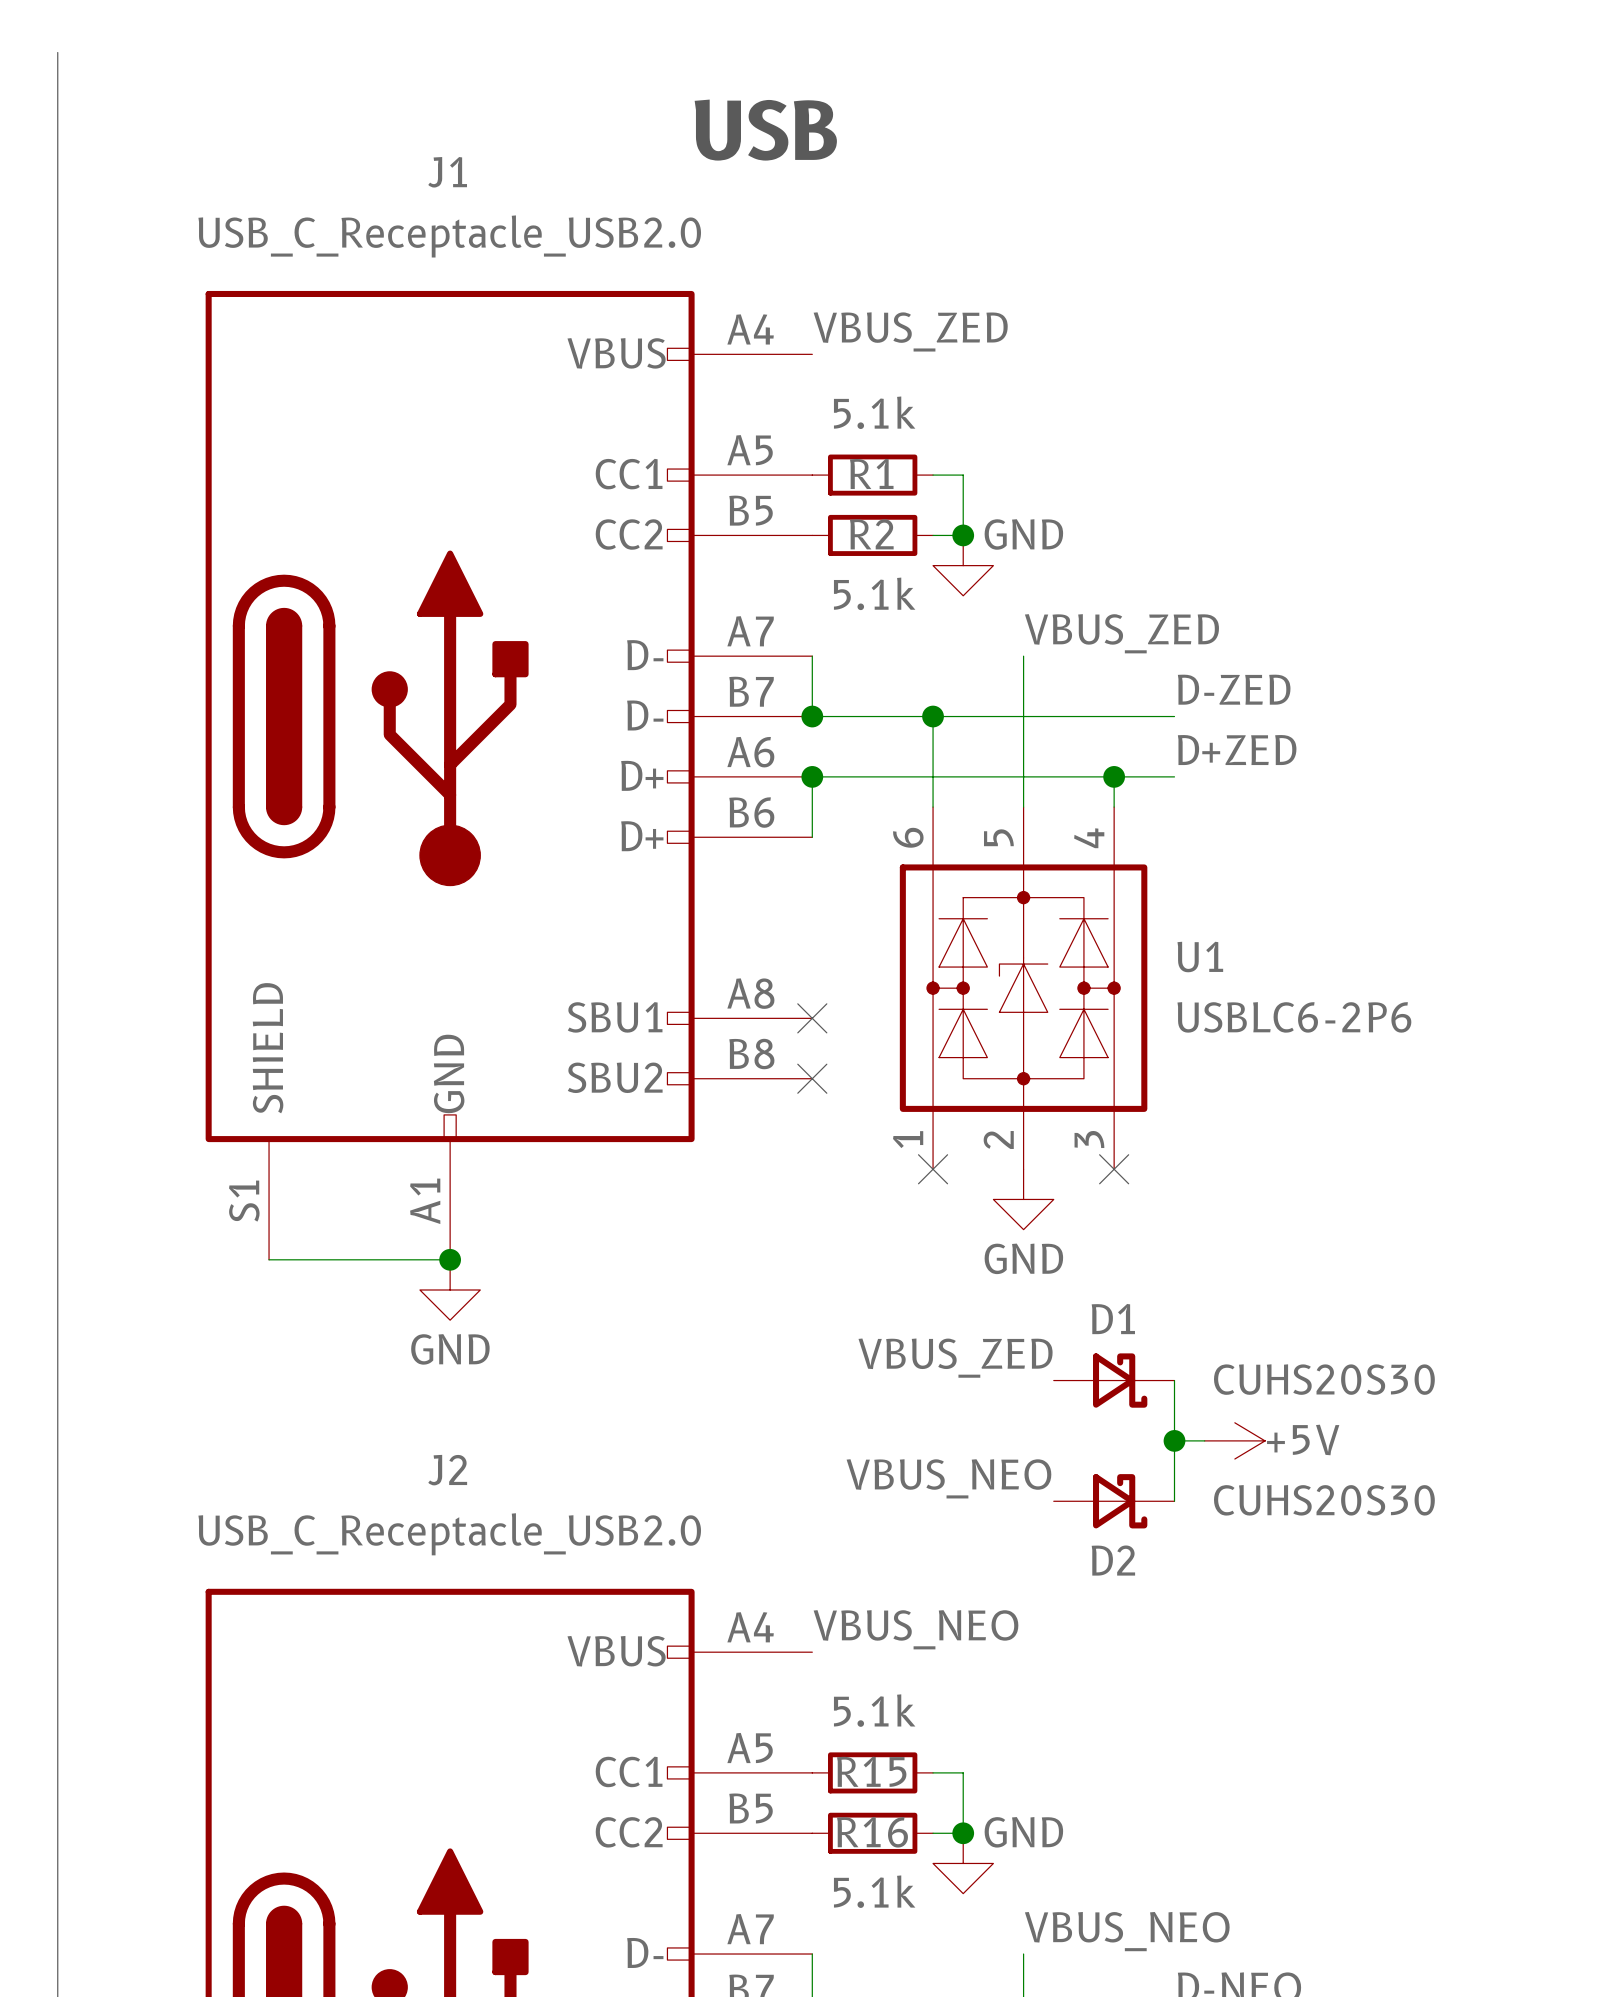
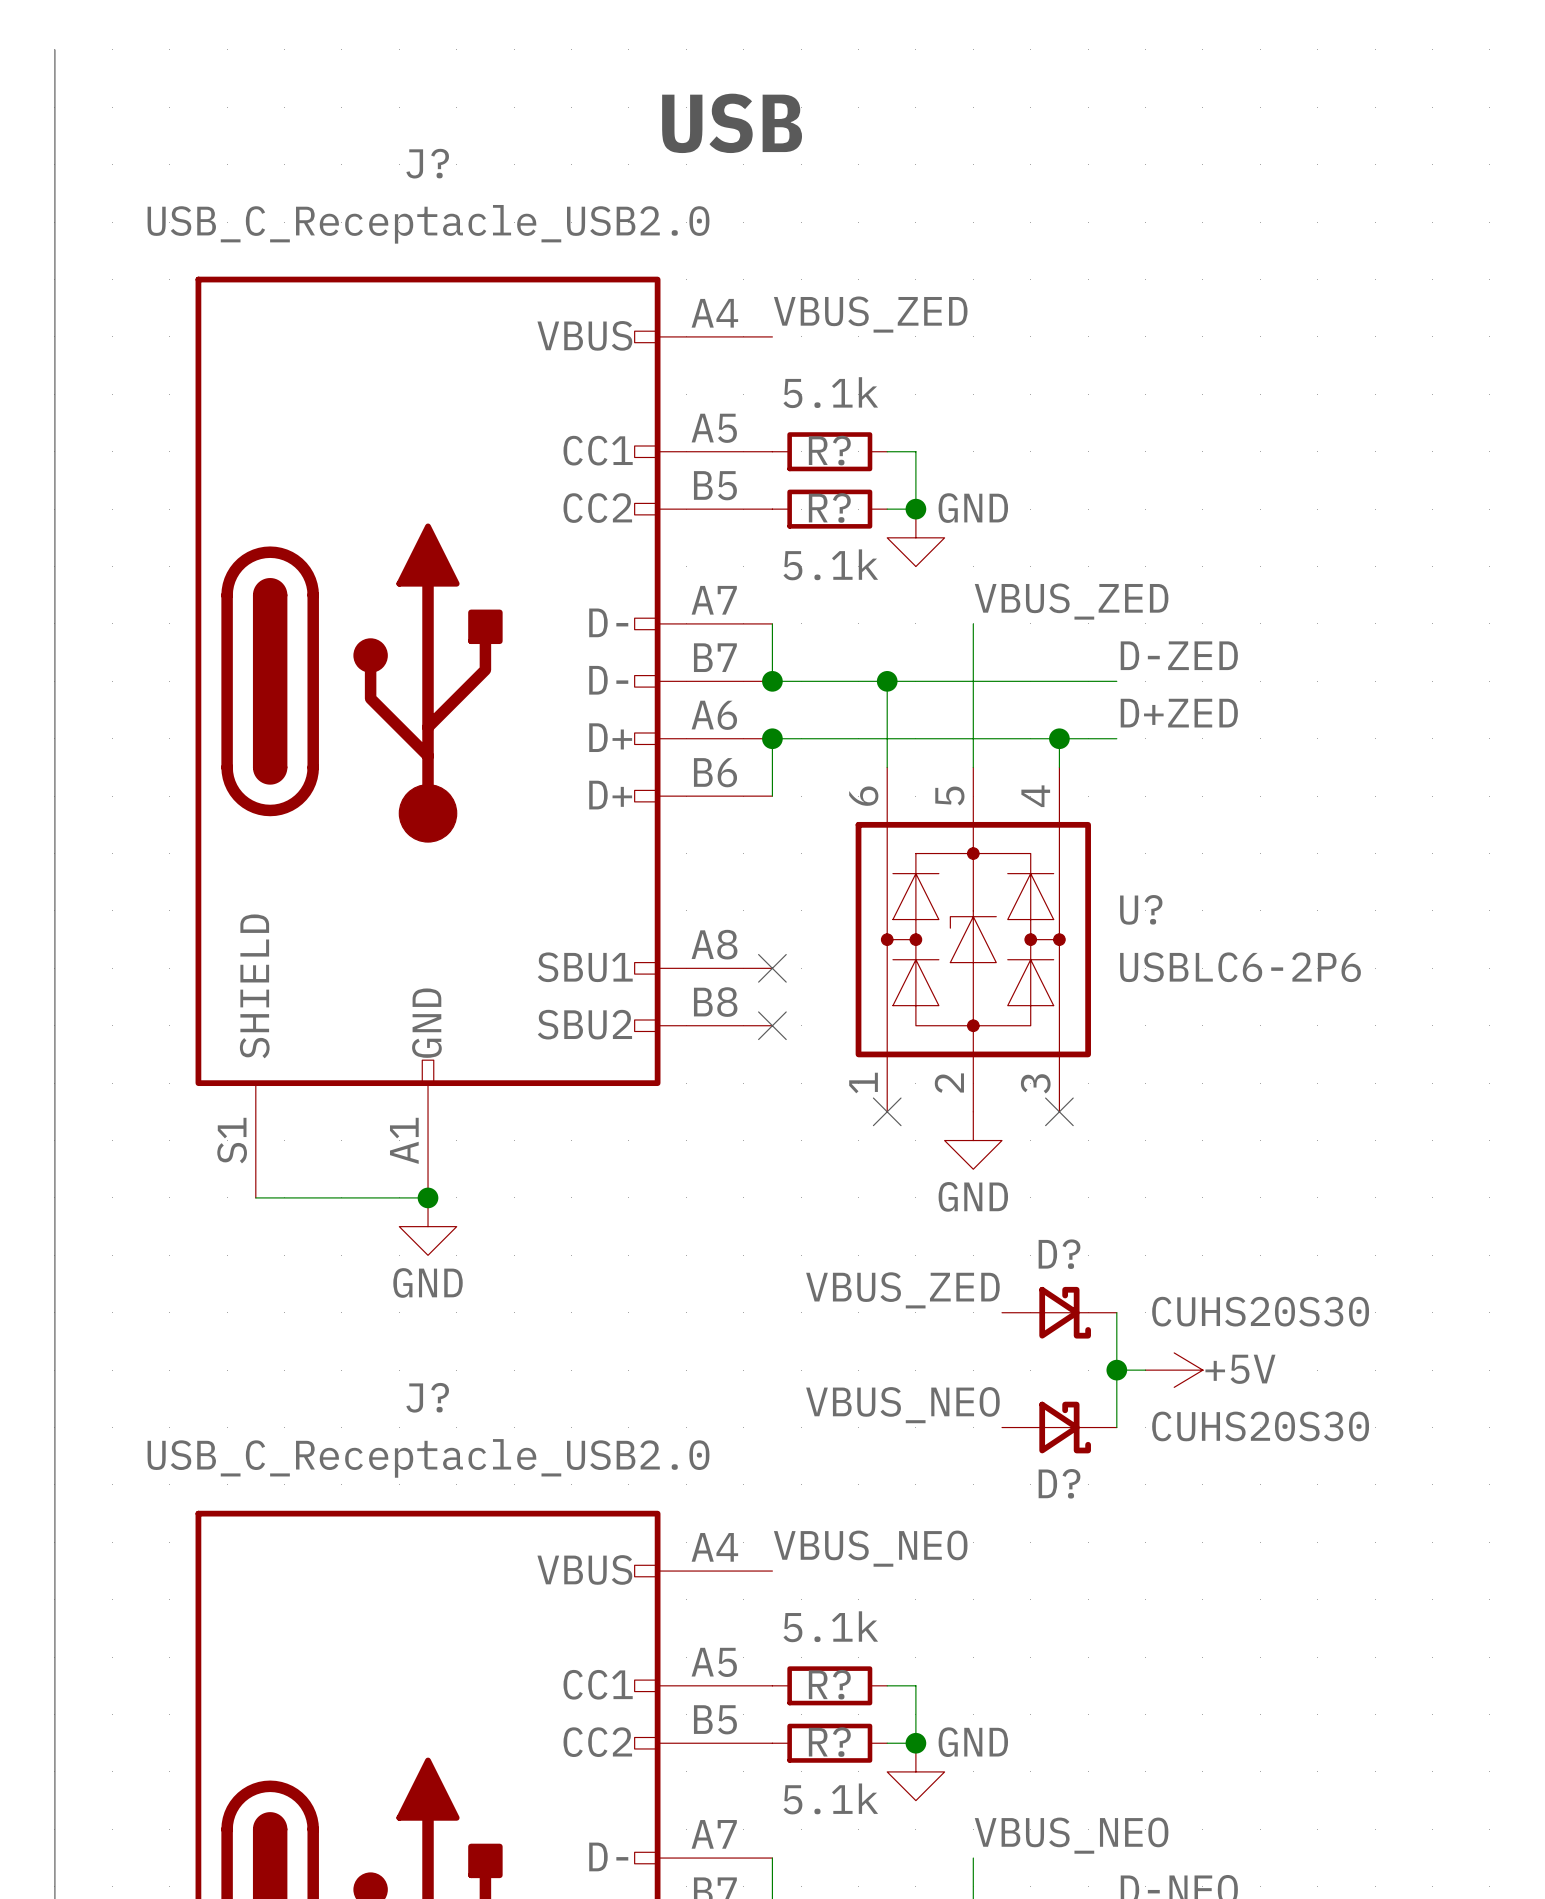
J1 name: J1 (447, 172) -> J? (427, 163)
R1 name: R1 (871, 473) -> R? (829, 450)
R2 name: R2 (871, 534) -> R? (829, 508)
U1 name: U1 (1200, 957) -> U? (1141, 909)
D1 name: D1 (1113, 1319) -> D? (1059, 1254)
J2 name: J2 (447, 1470) -> J? (427, 1397)
D2 name: D2 (1113, 1560) -> D? (1059, 1483)
R15 name: R15 (871, 1771) -> R? (829, 1684)
R16 name: R16 (872, 1832) -> R? (829, 1742)

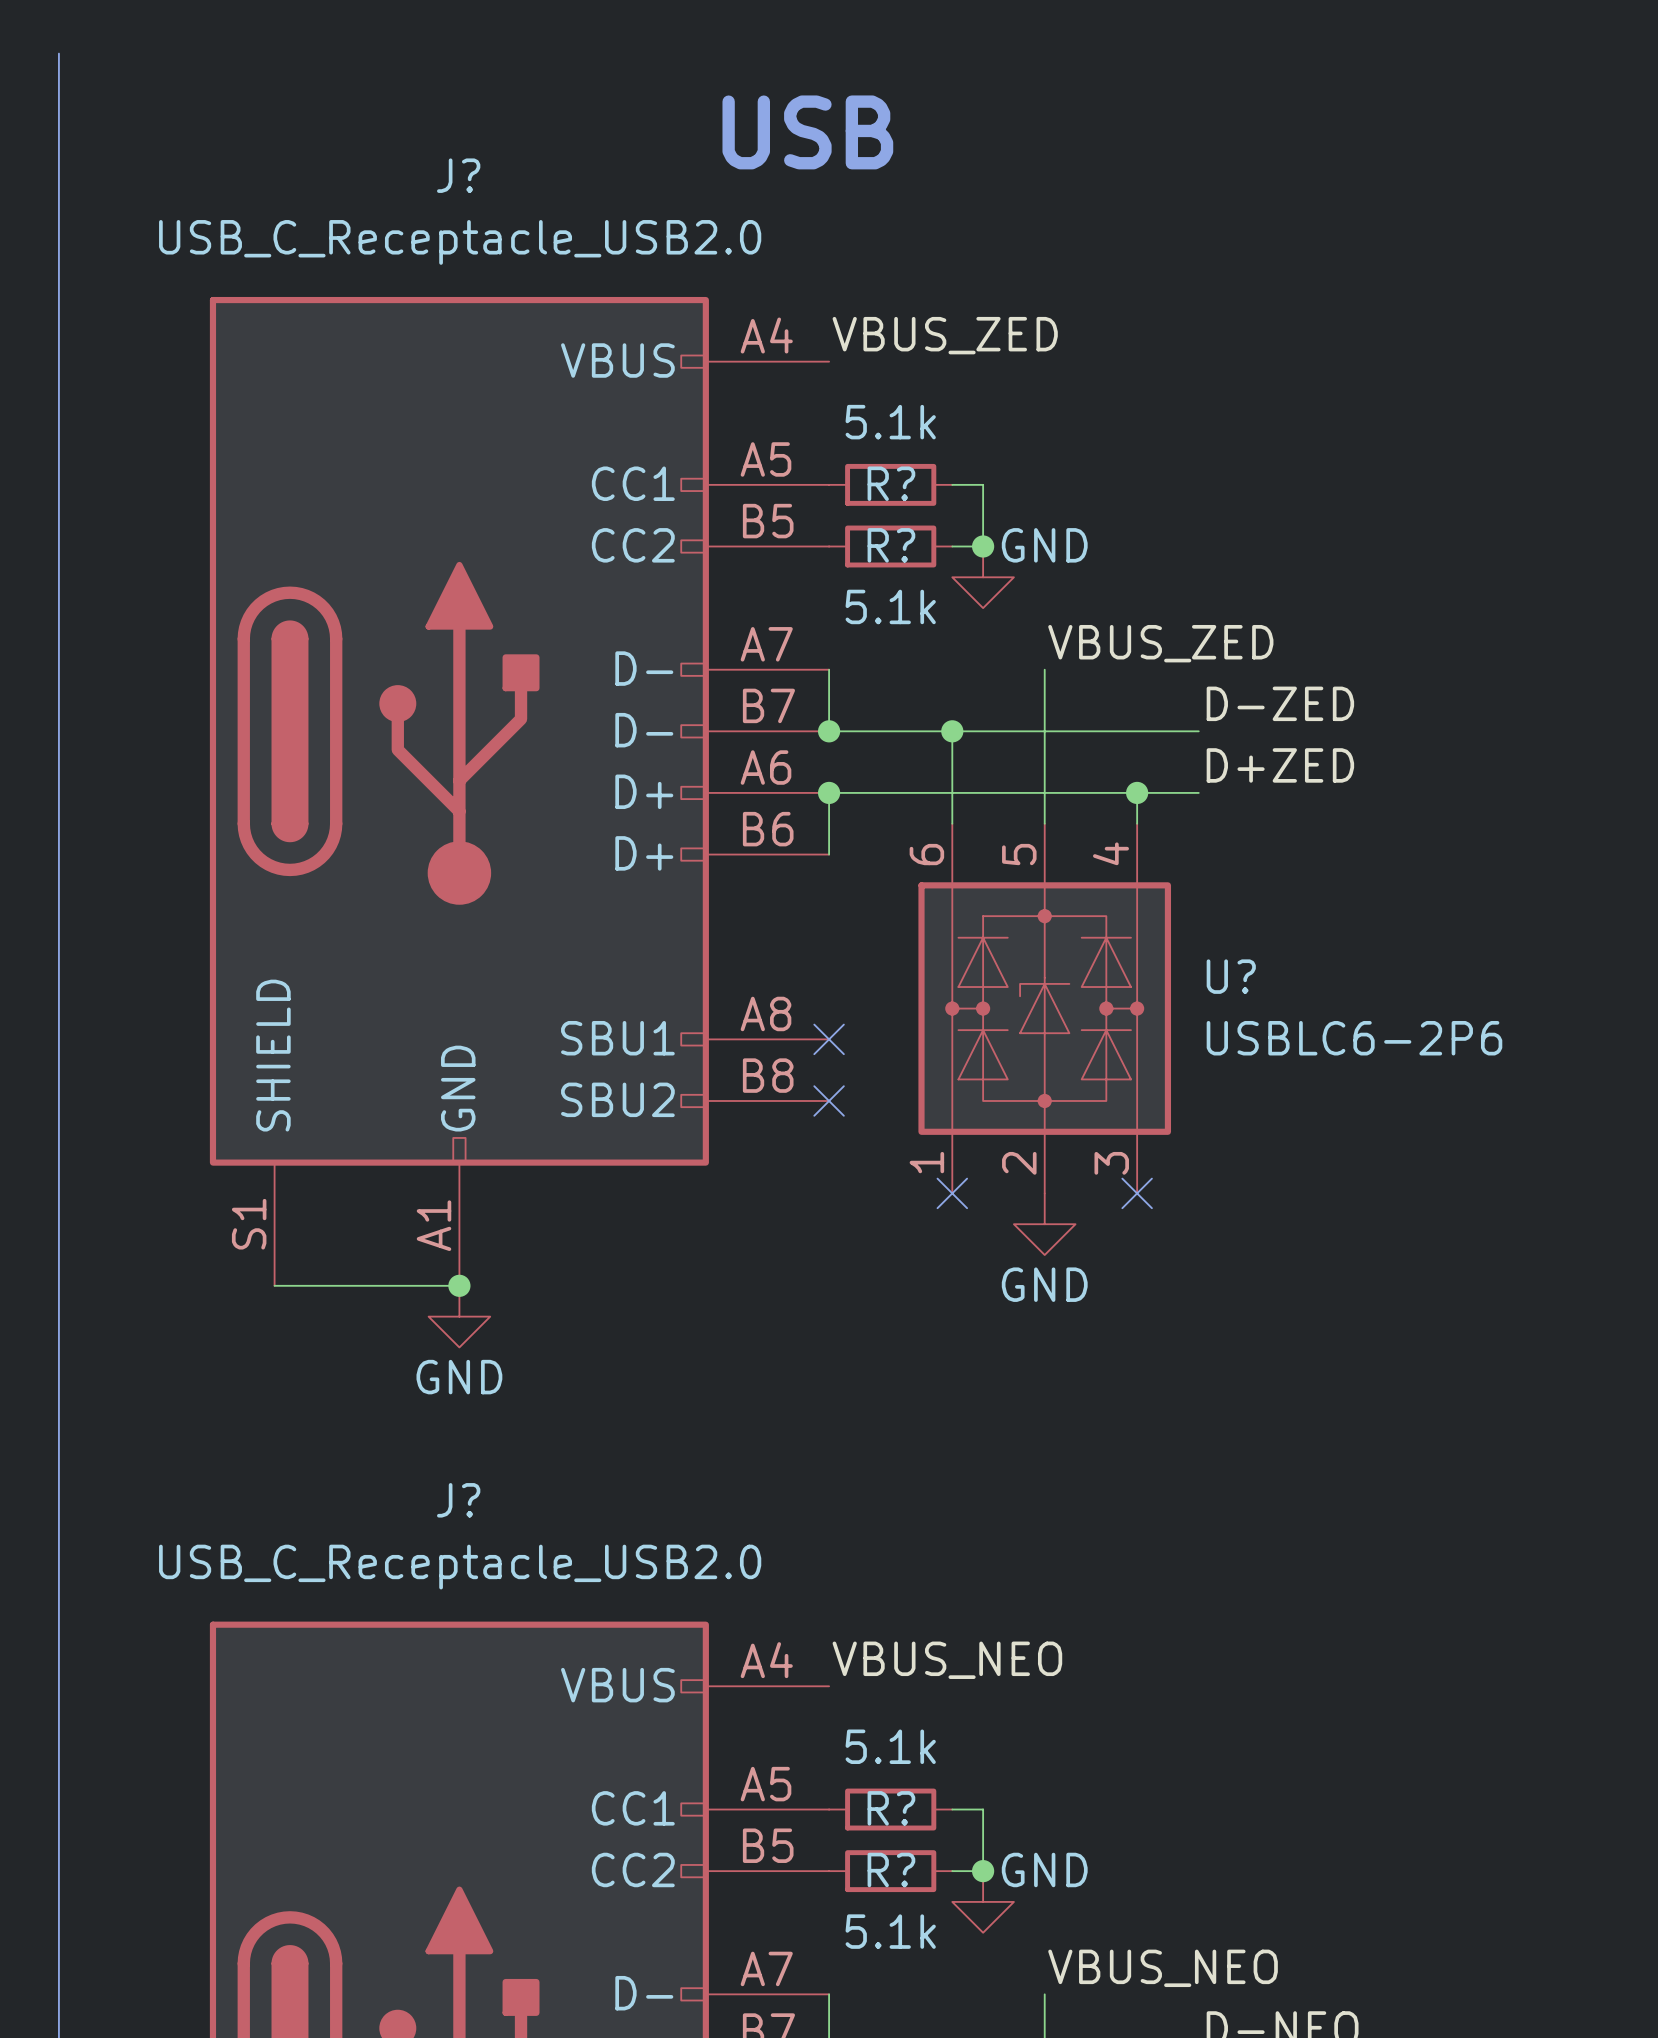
label: VBUS_ZED (902, 1290) -> none
D?: CUHS20S30 (1059, 1312) -> none
wire: (1116, 1312) (1116, 1427) -> none
wire: (1116, 1370) (1145, 1370) -> none
junction: (1116, 1370) -> none
power symbol: +5V (1174, 1370) -> none
label: VBUS_NEO (902, 1405) -> none
D?: CUHS20S30 (1059, 1427) -> none

